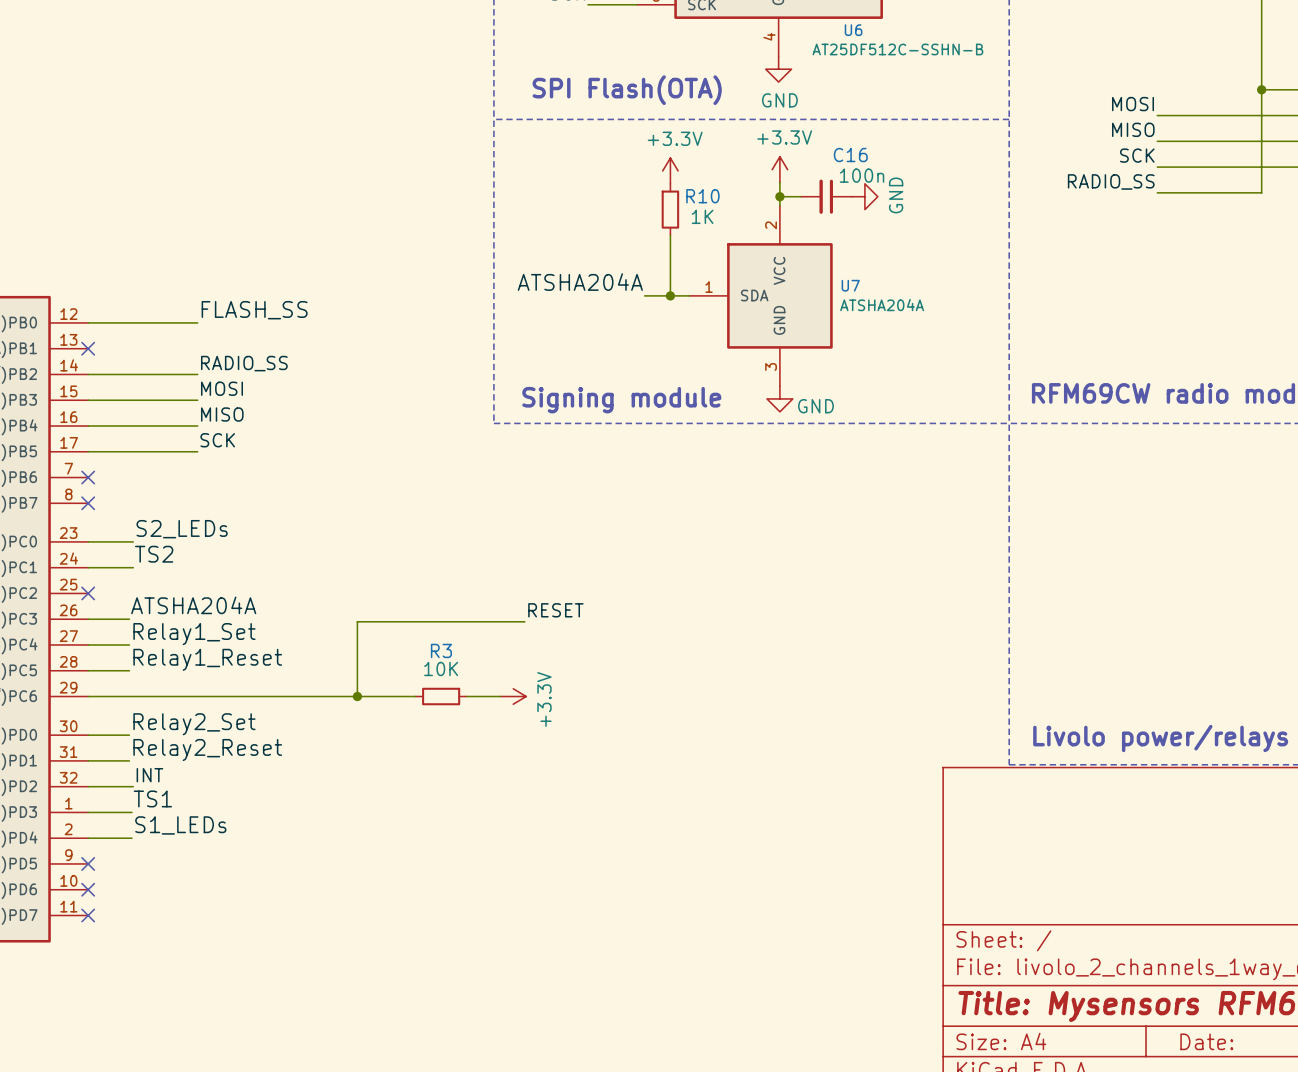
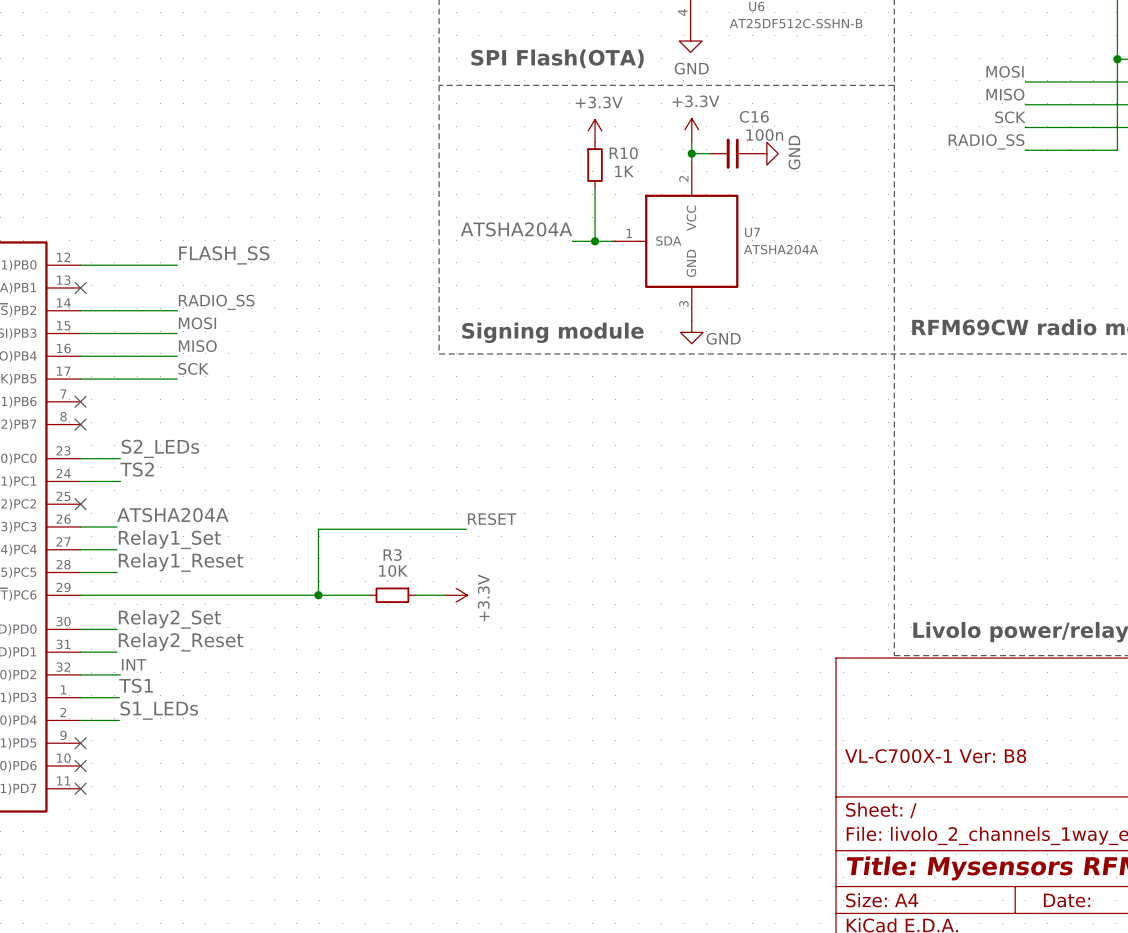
title block: none -> VL-C700X-1 Ver: B8 (935, 756)

